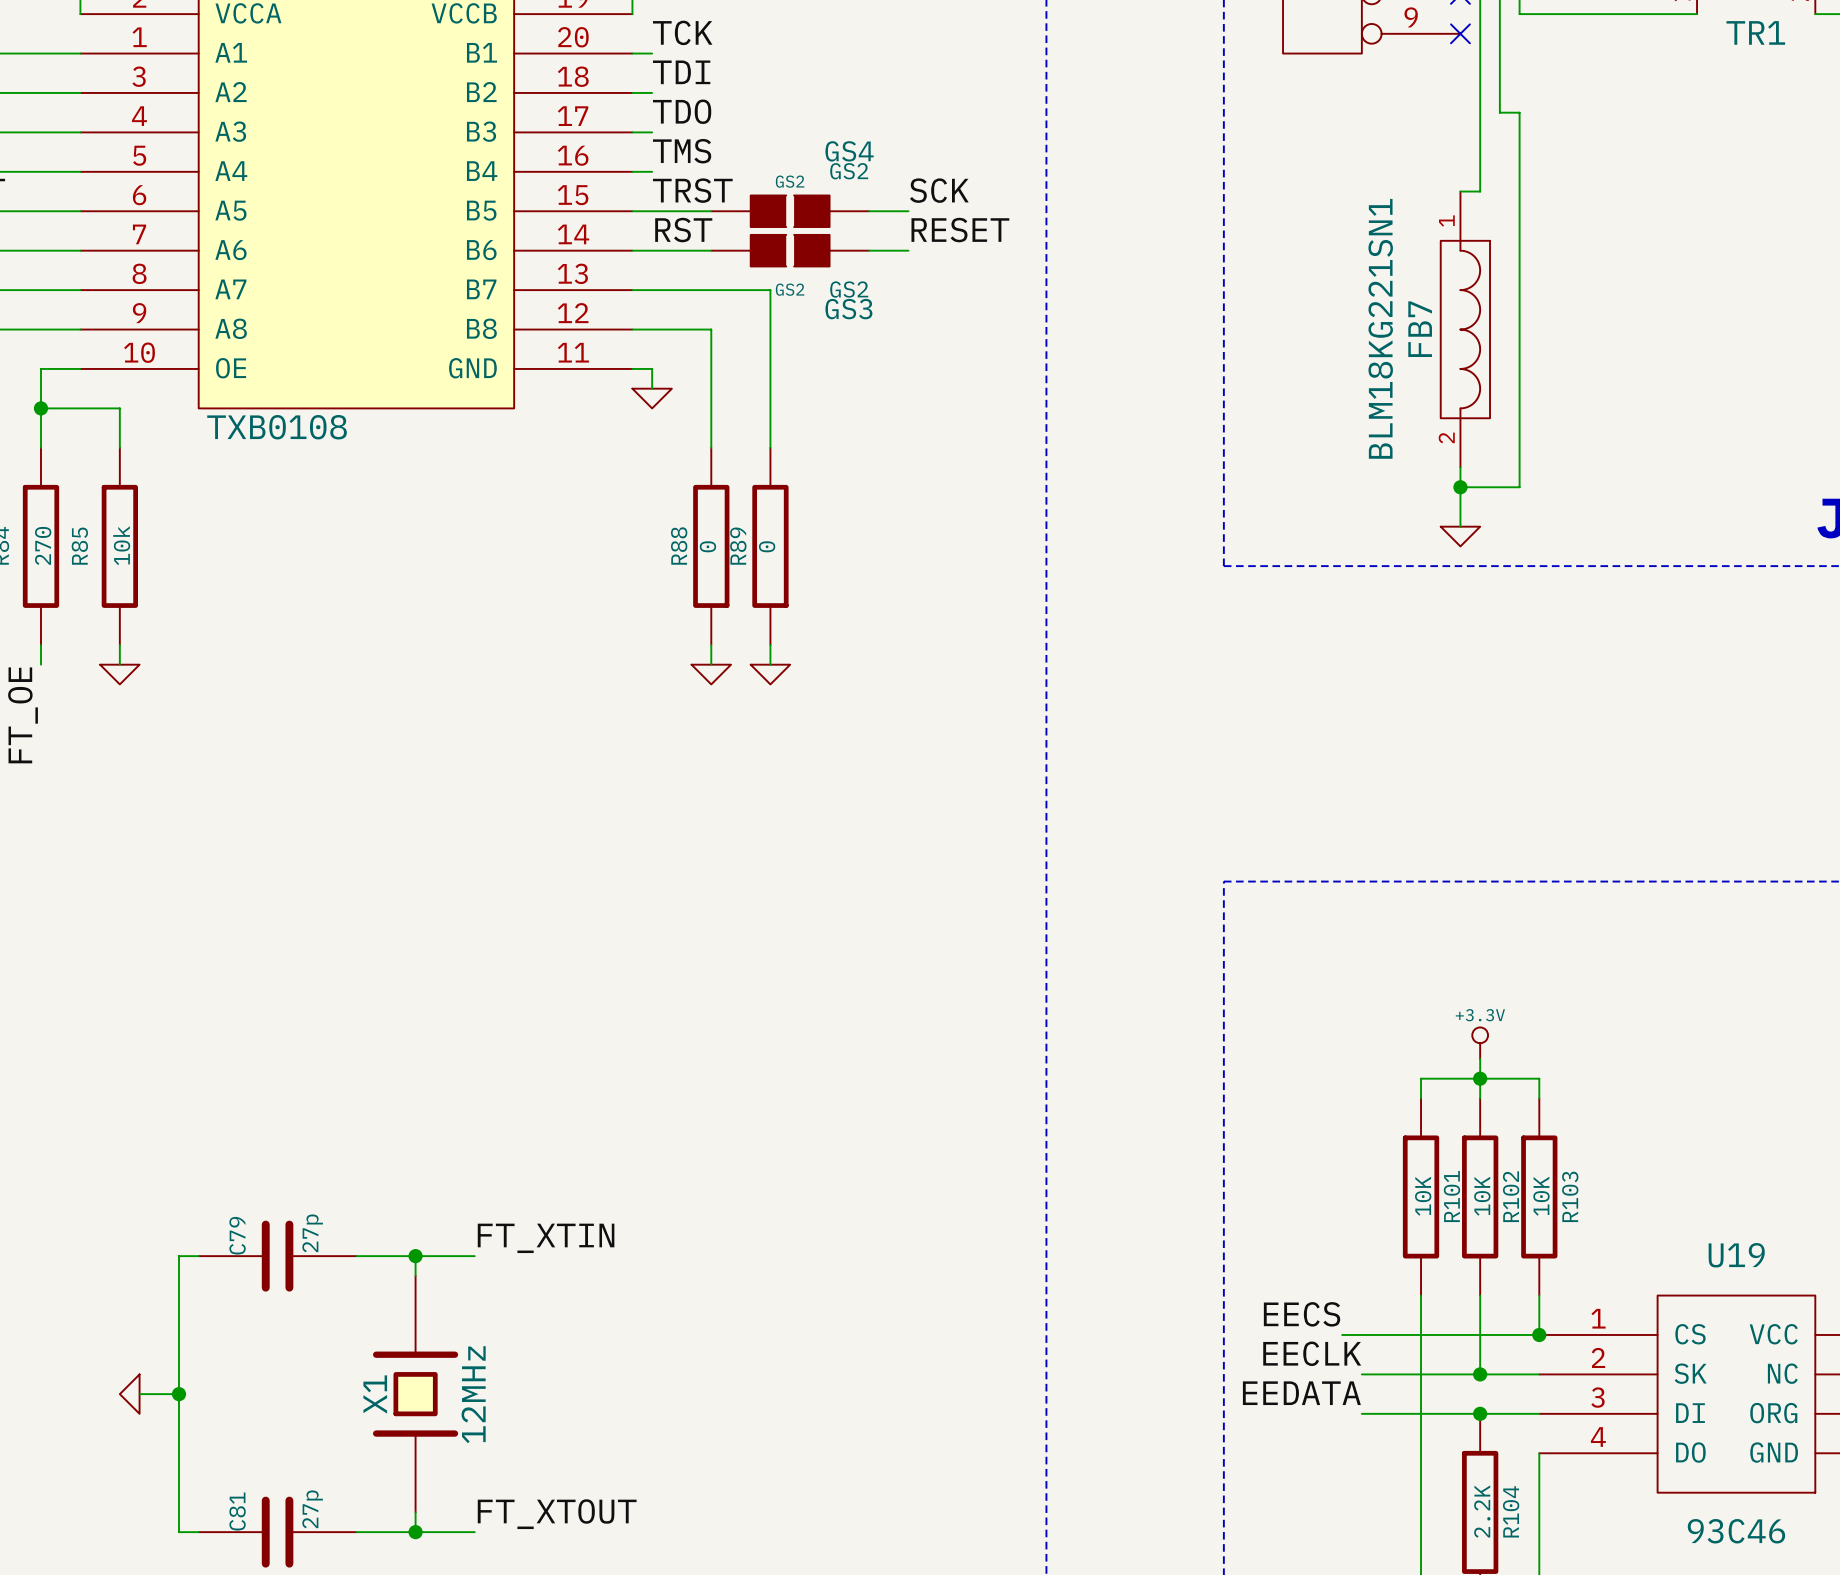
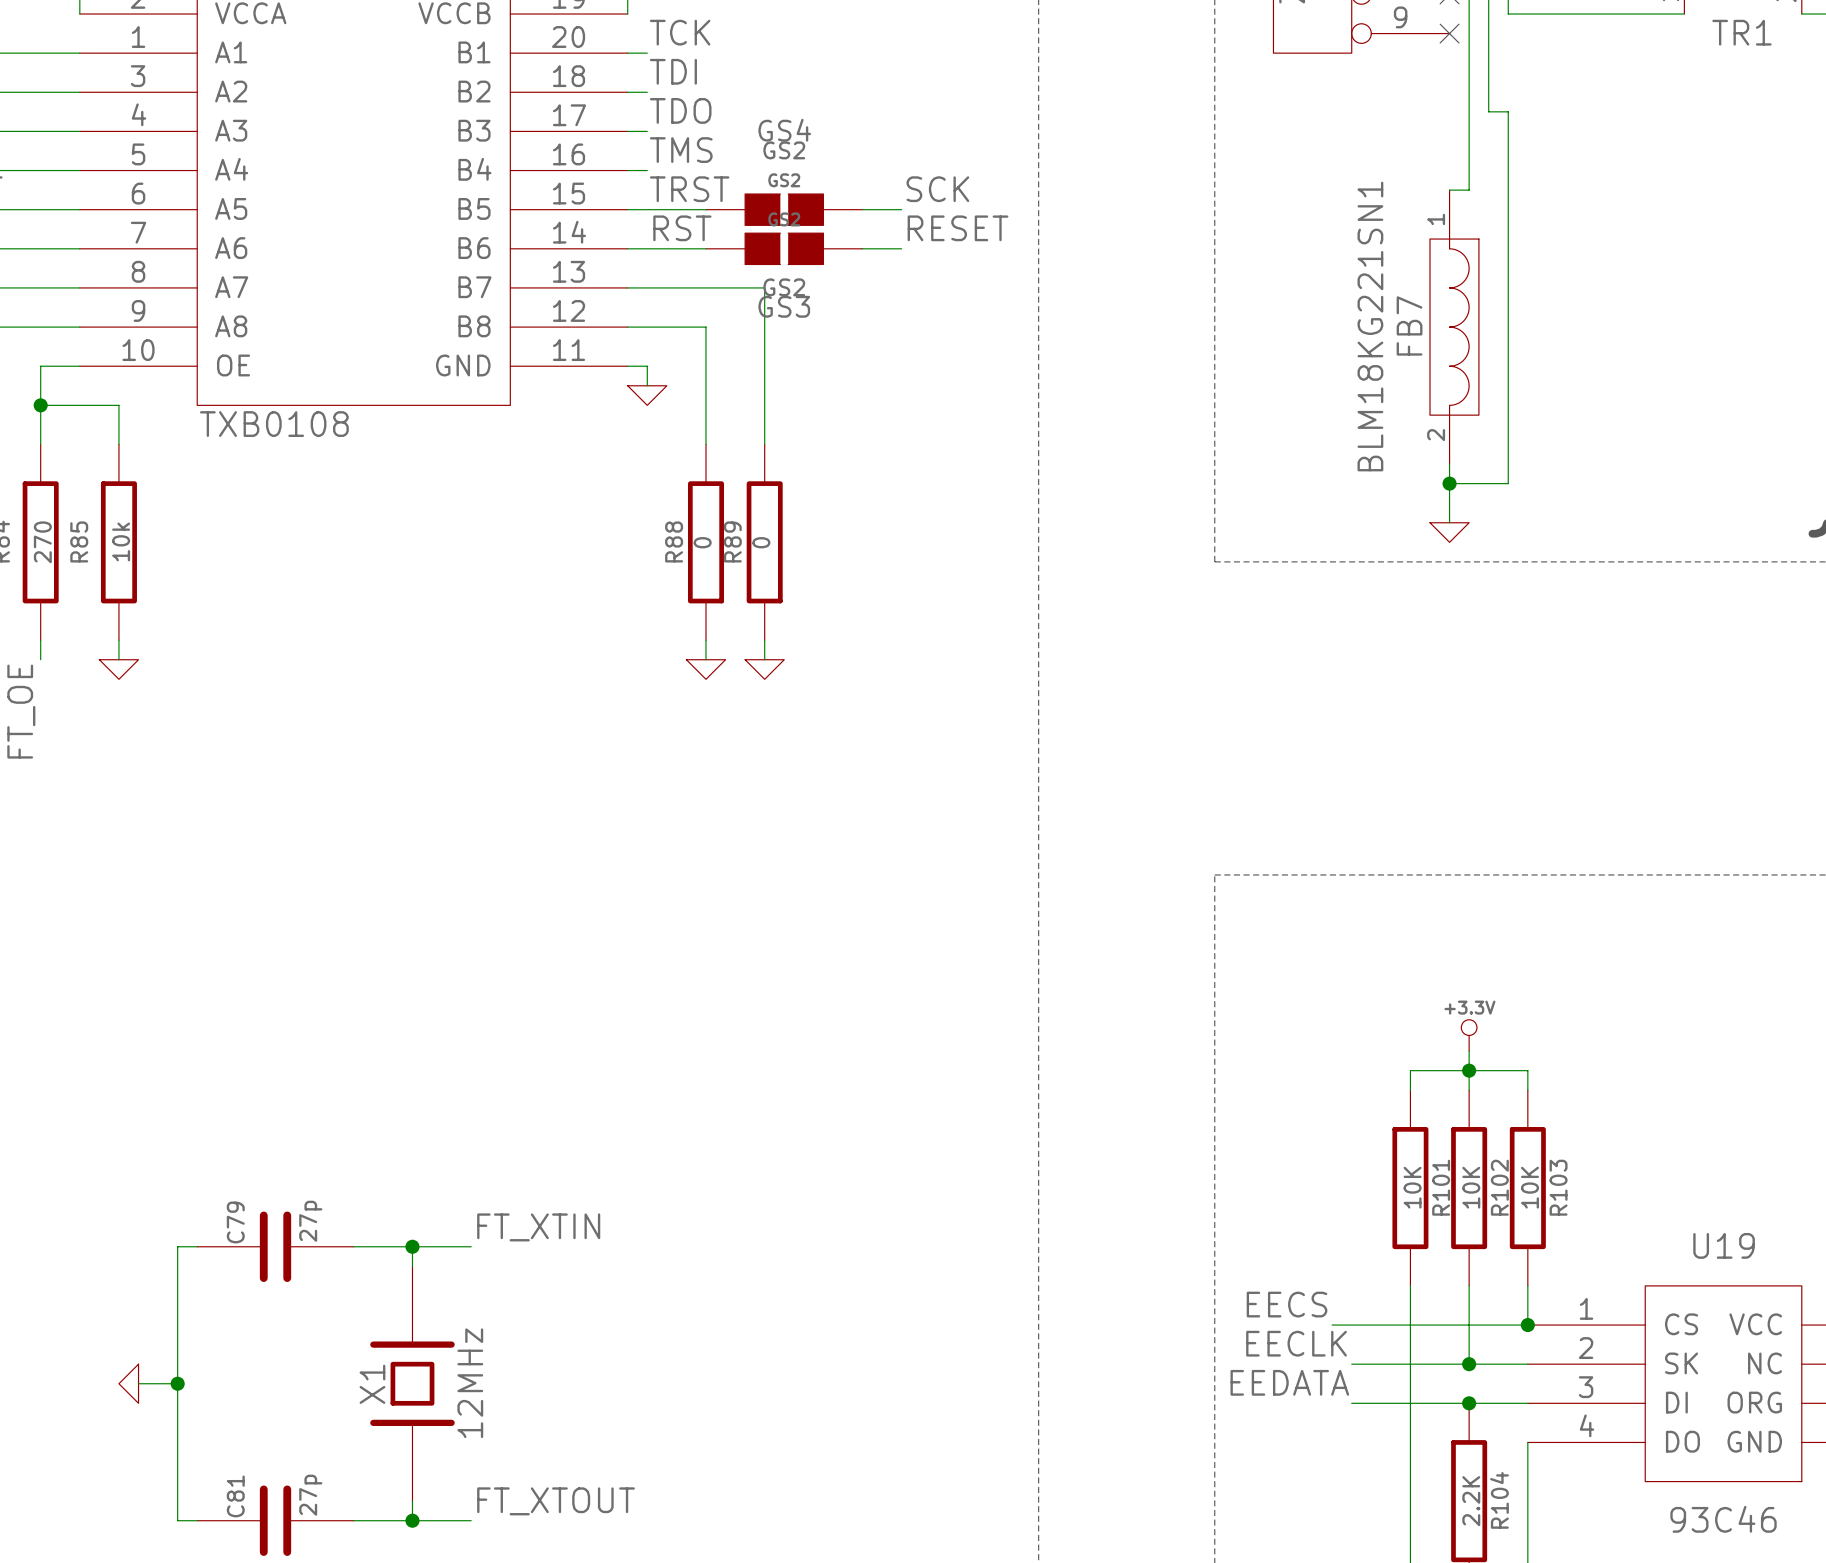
GS4 name position: GS4 (849, 151) -> GS4 (784, 130)
GS4 value position: GS2 (849, 171) -> GS2 (784, 150)
GS3 text position: GS2 (790, 289) -> GS2 (784, 219)
GS3 value position: GS2 (849, 289) -> GS2 (784, 287)
GS3 name position: GS3 (848, 309) -> GS3 (784, 306)

